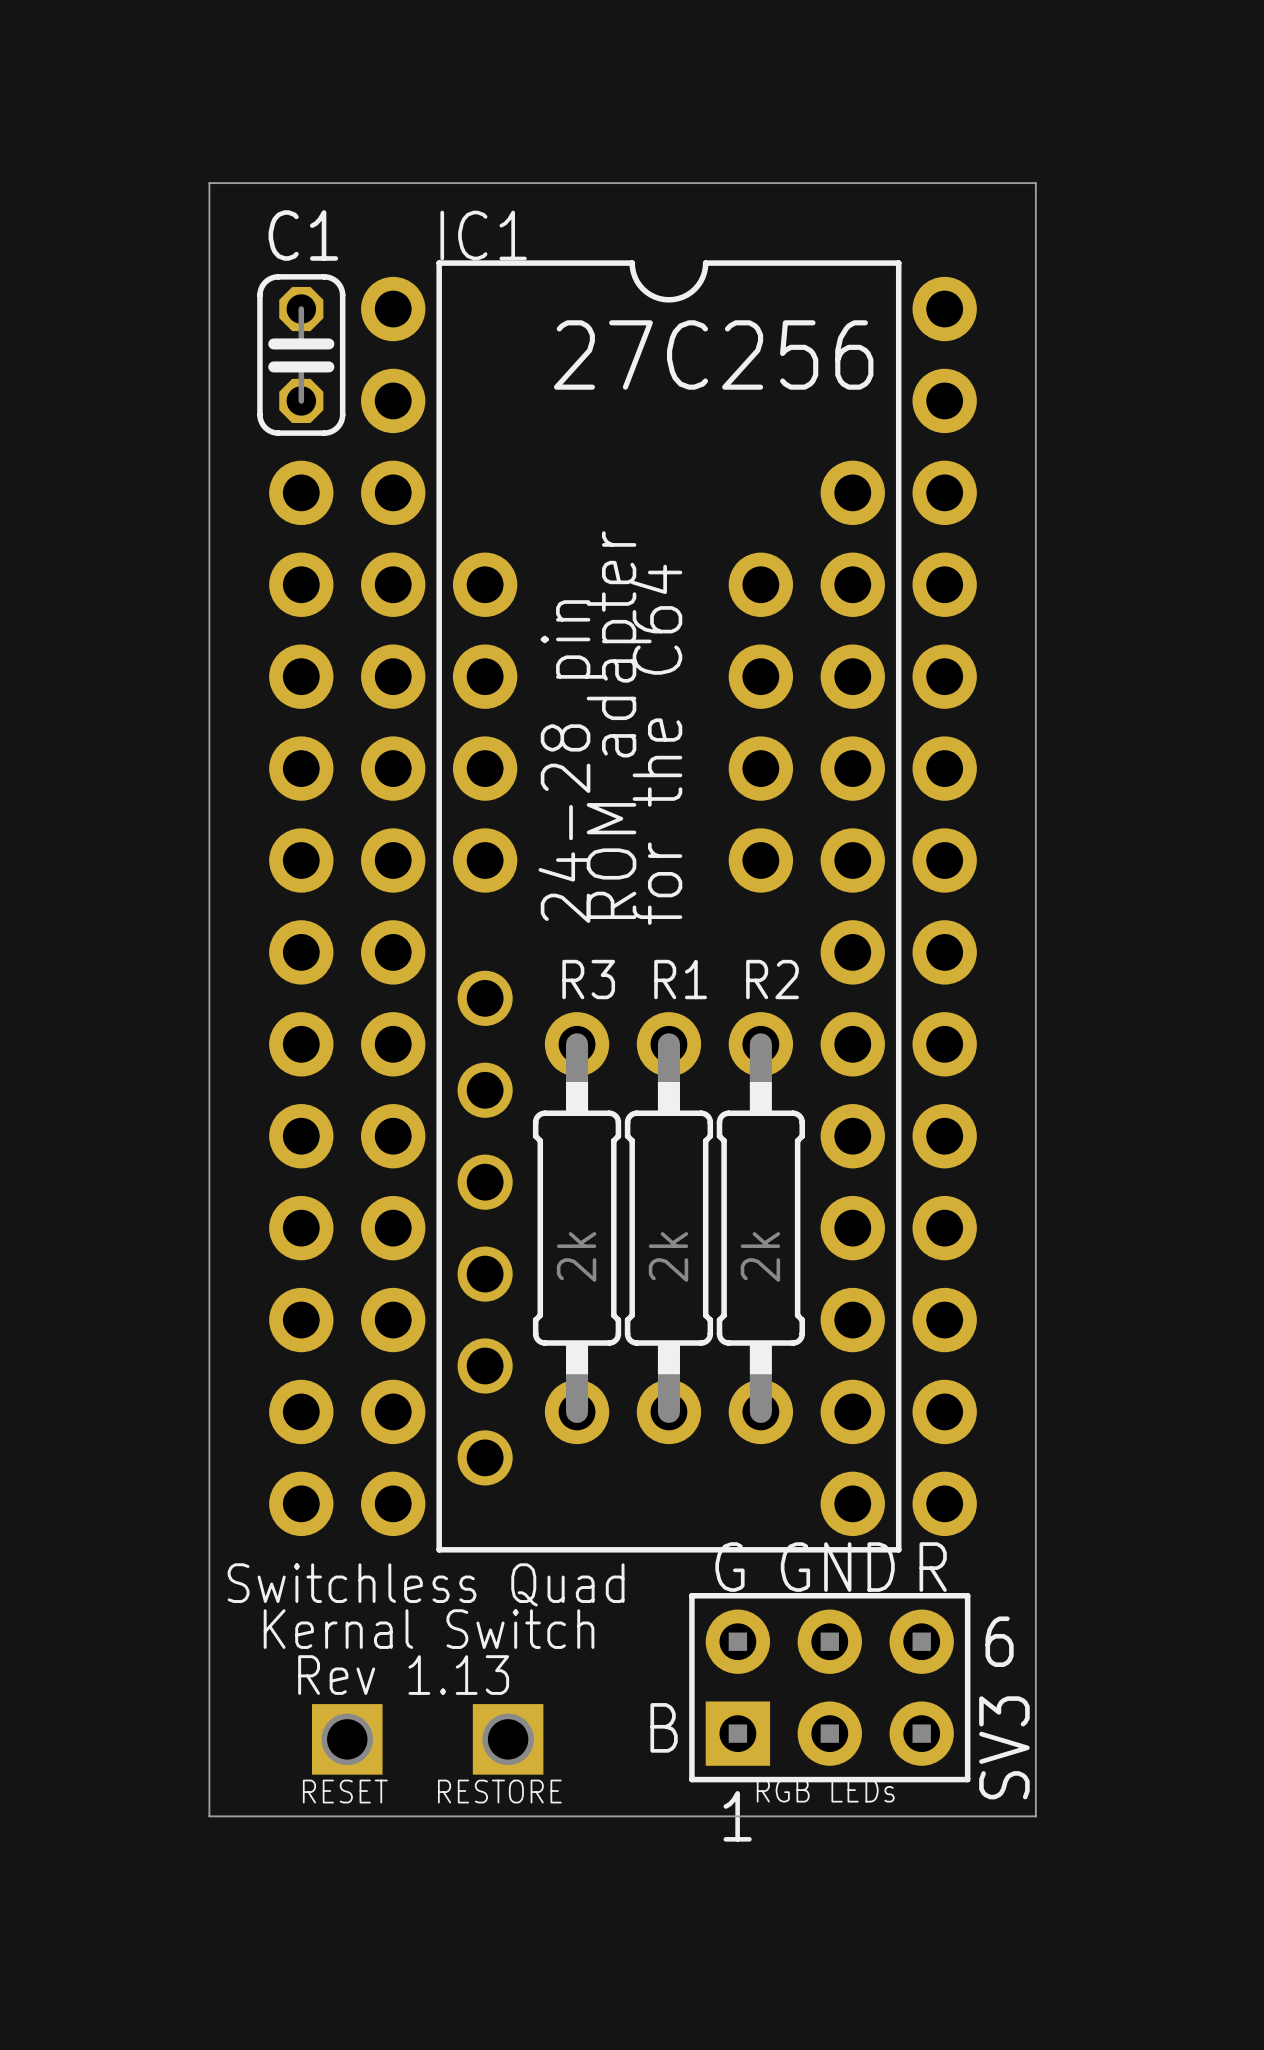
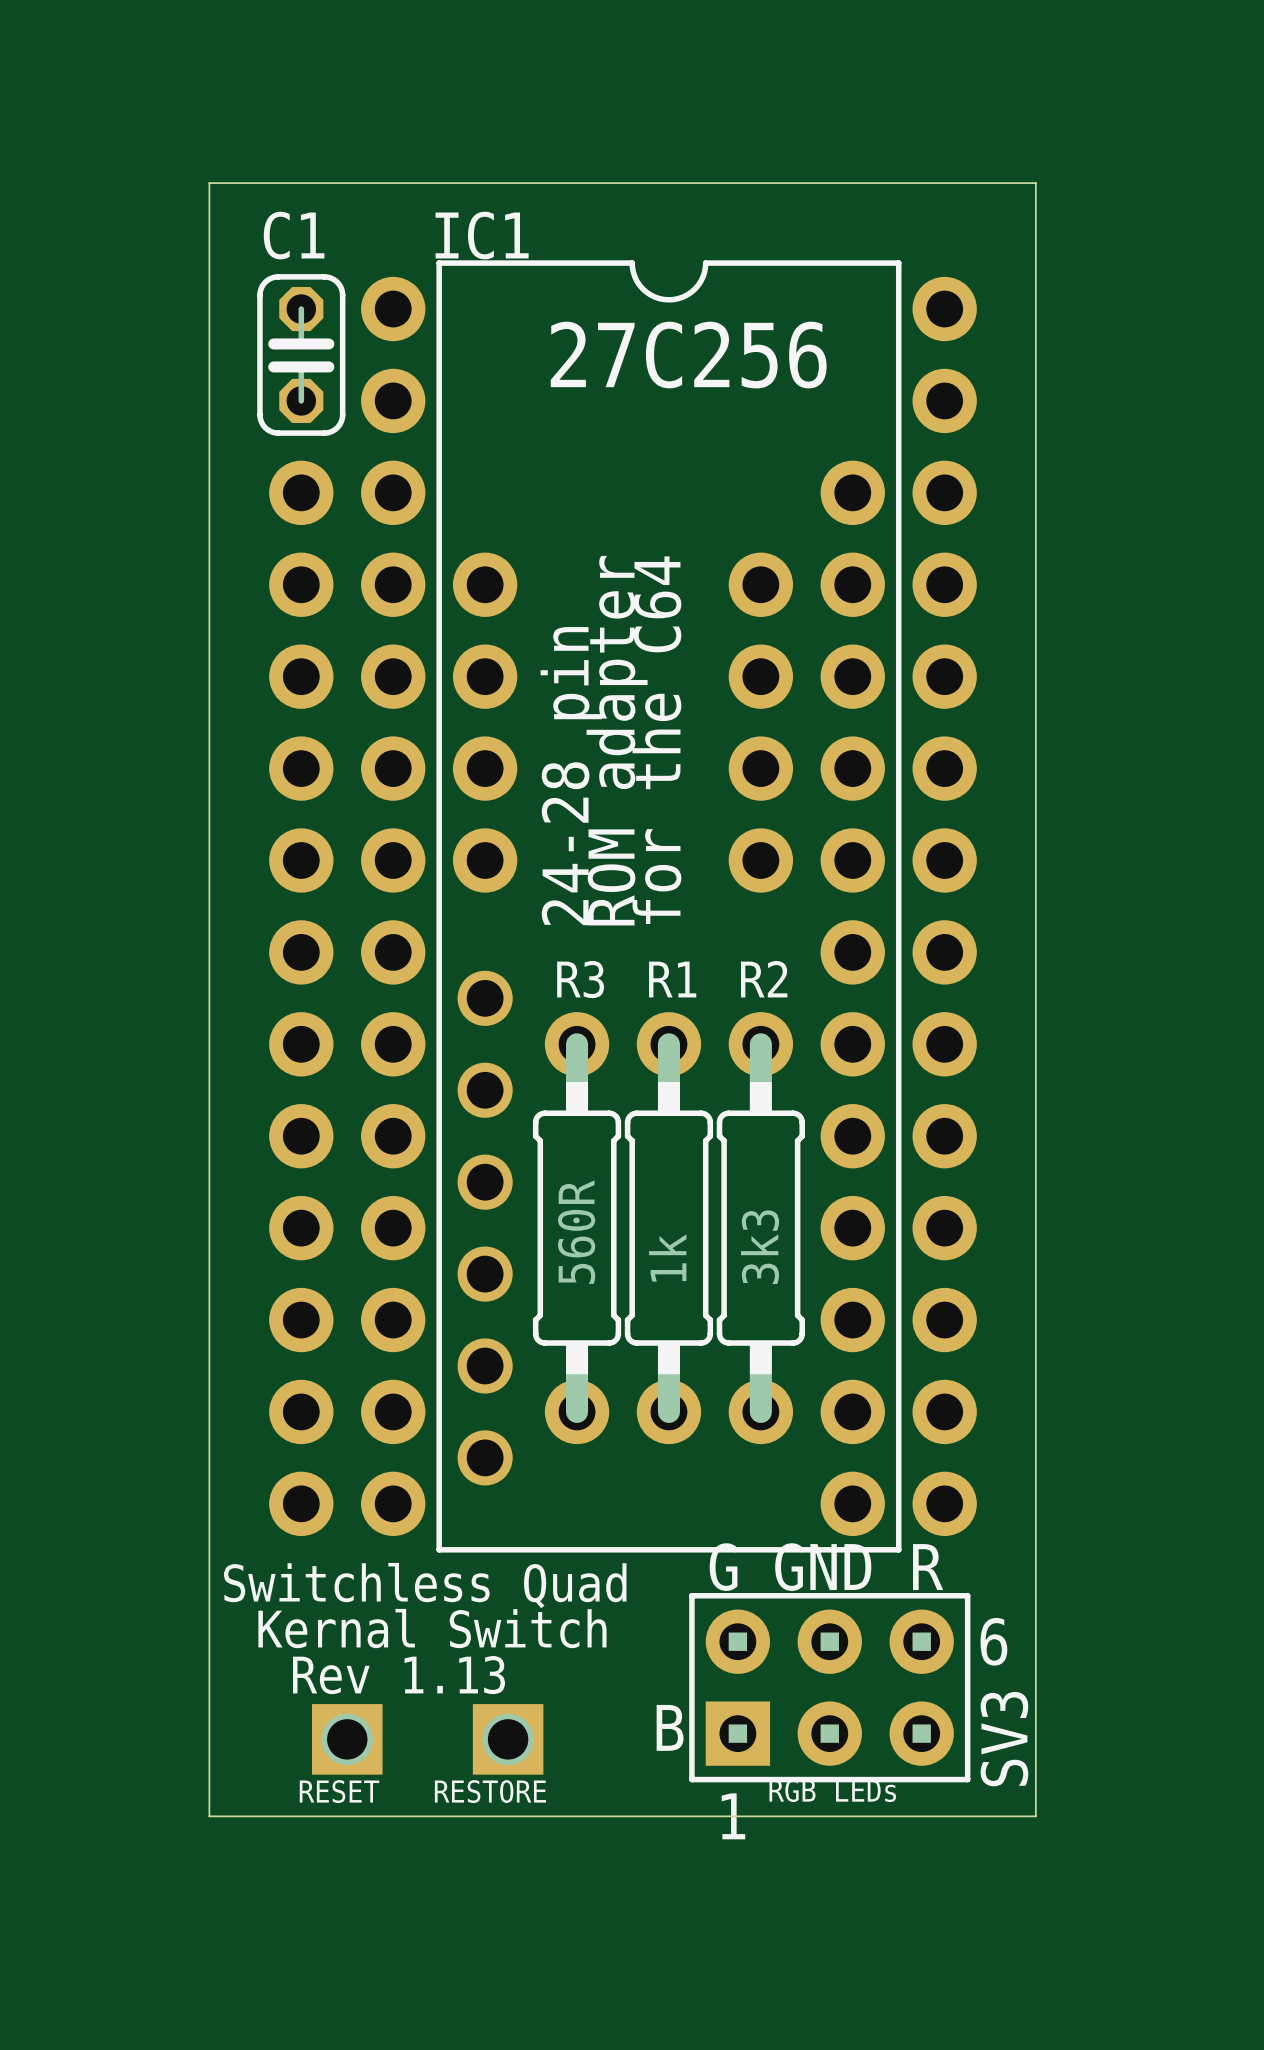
R3 value: 2k (576, 1256) -> 560R (576, 1232)
R1 value: 2k (668, 1256) -> 1k (667, 1257)
R2 value: 2k (760, 1256) -> 3k3 (759, 1247)

